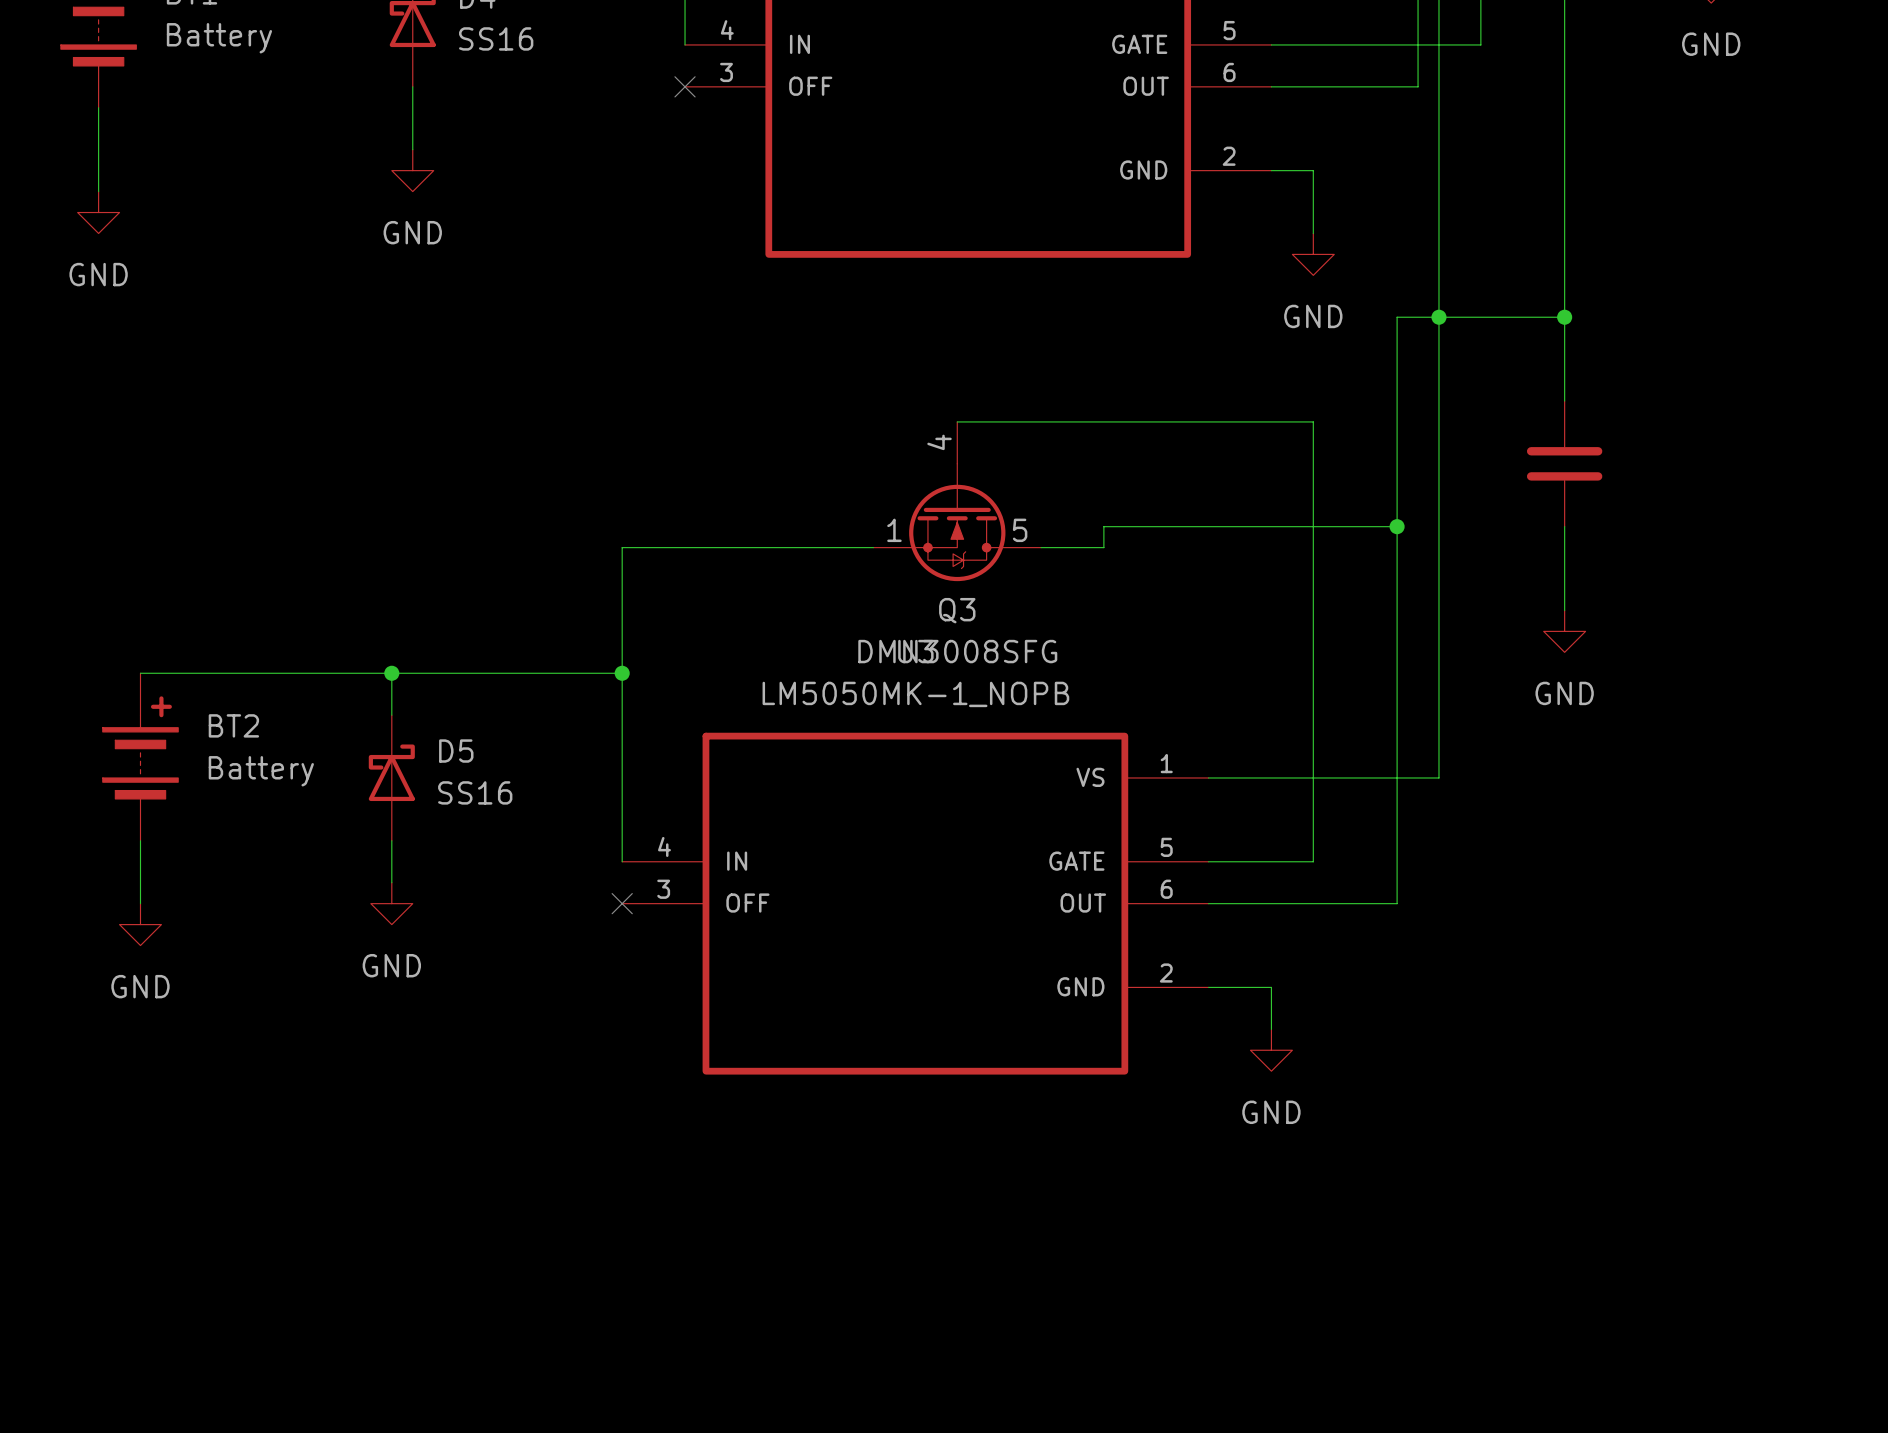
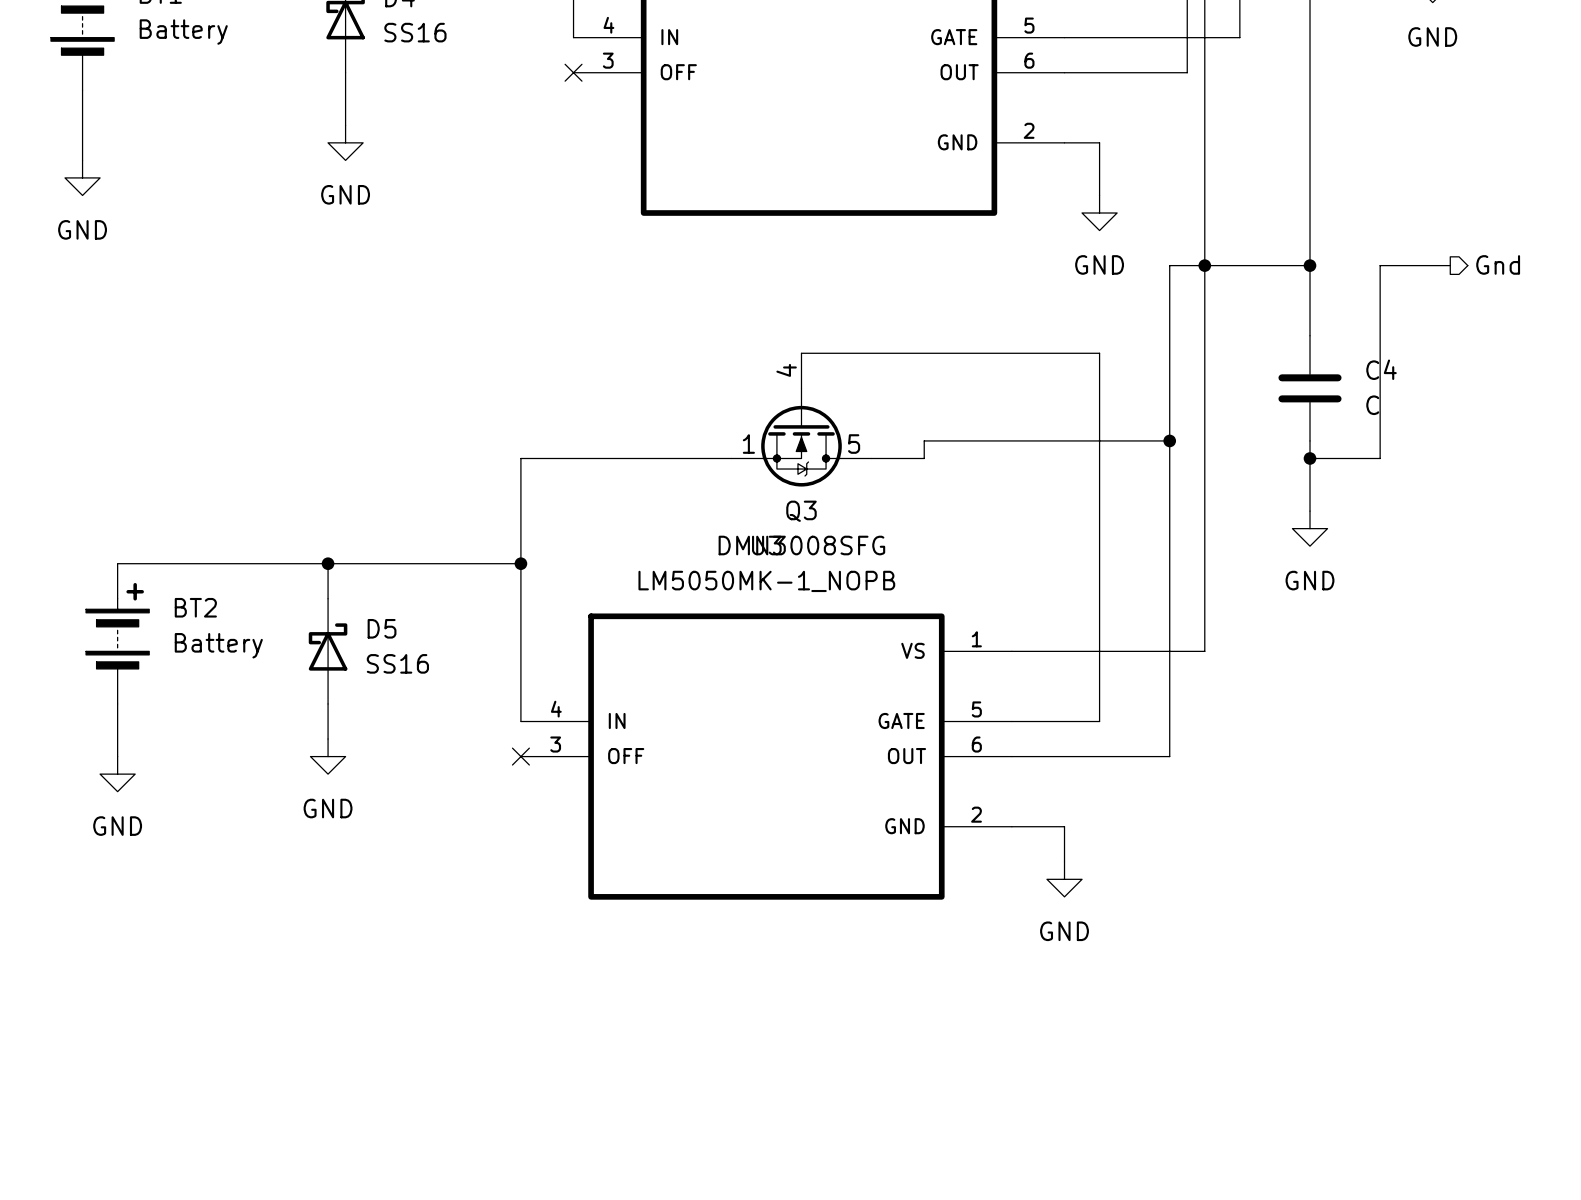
hierarchical label: none -> Gnd (1498, 264)
wire: none -> (1450, 265) (1380, 265) (1380, 458) (1310, 458)
C4 name: none -> C4 (1381, 369)
C4 value: none -> C (1372, 405)
junction: none -> (1310, 458)

